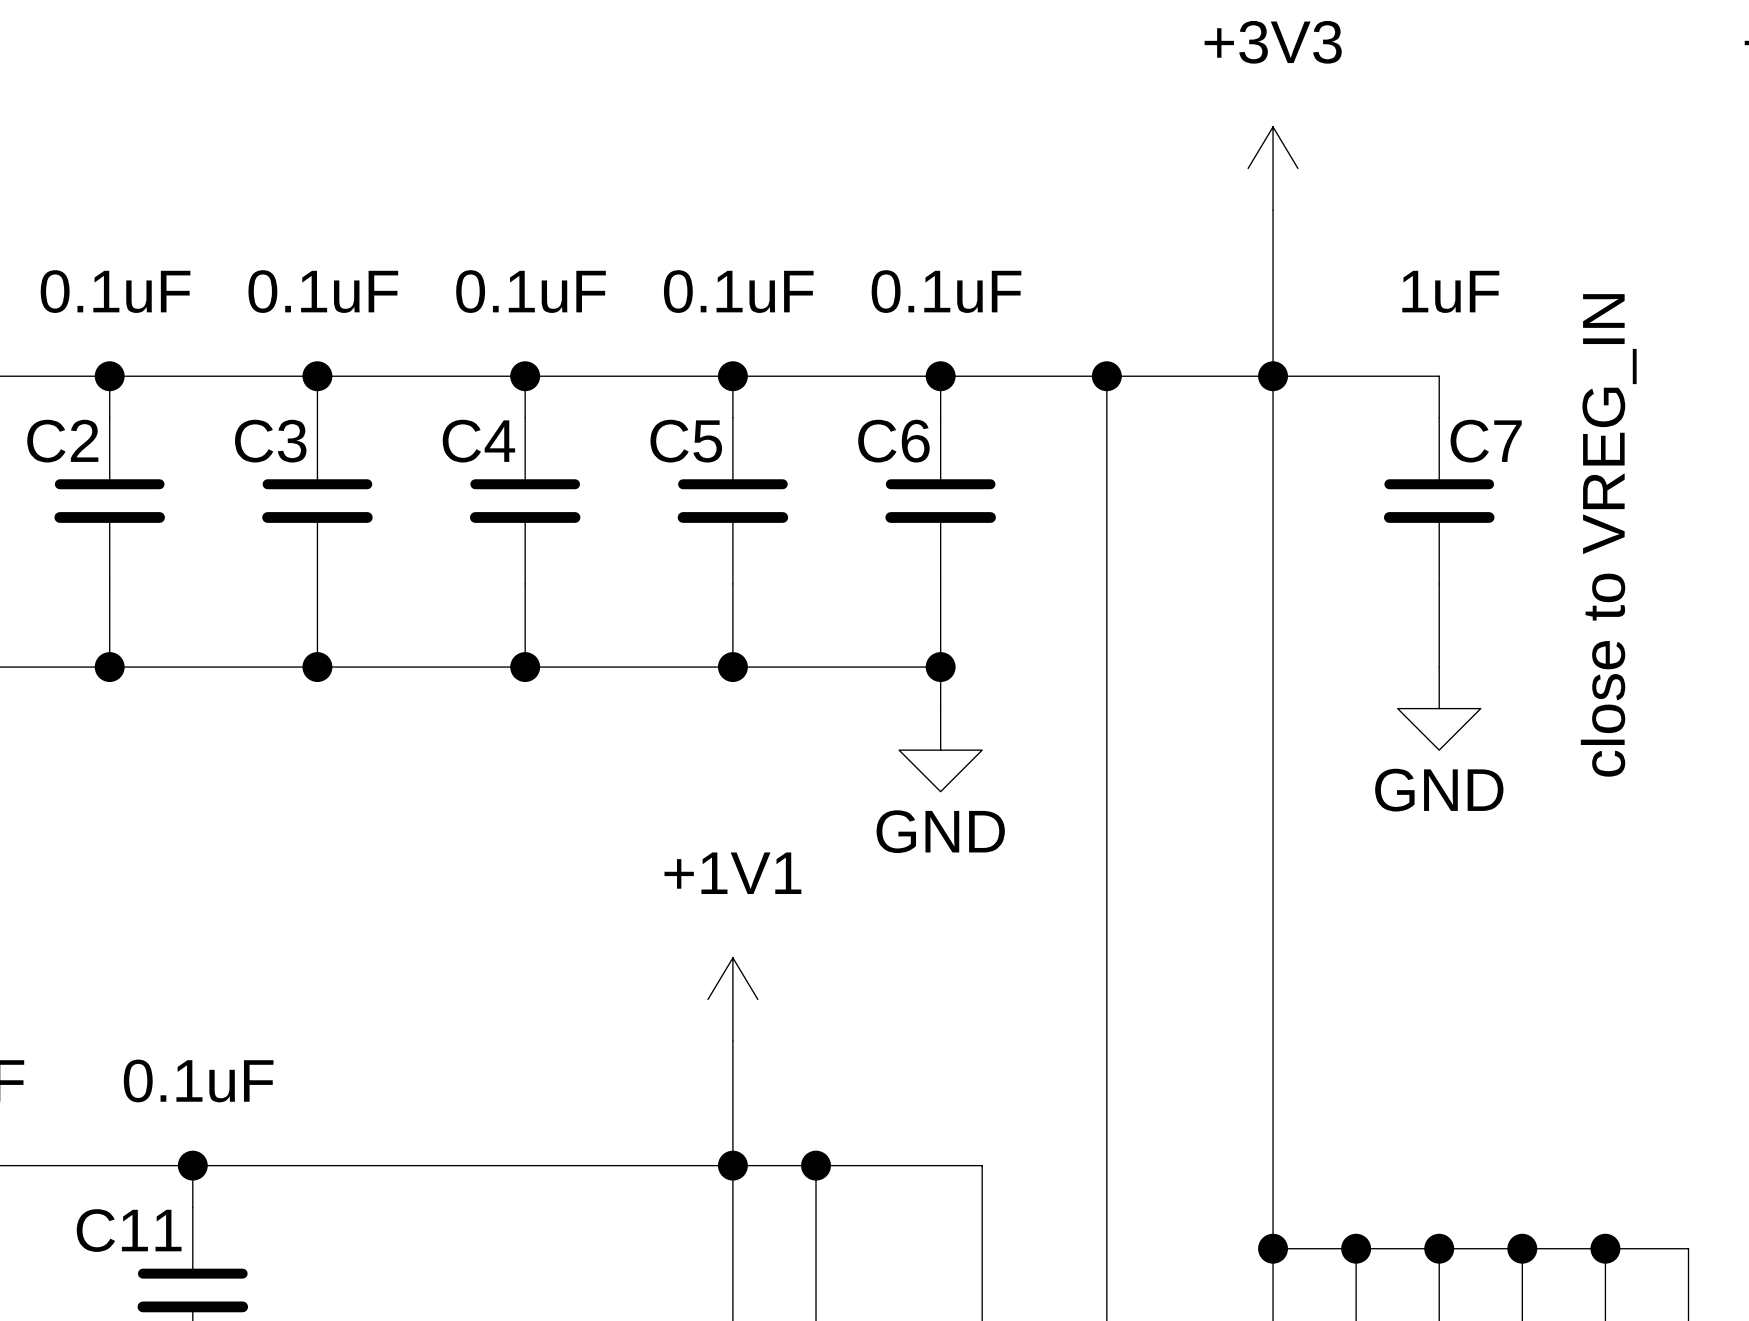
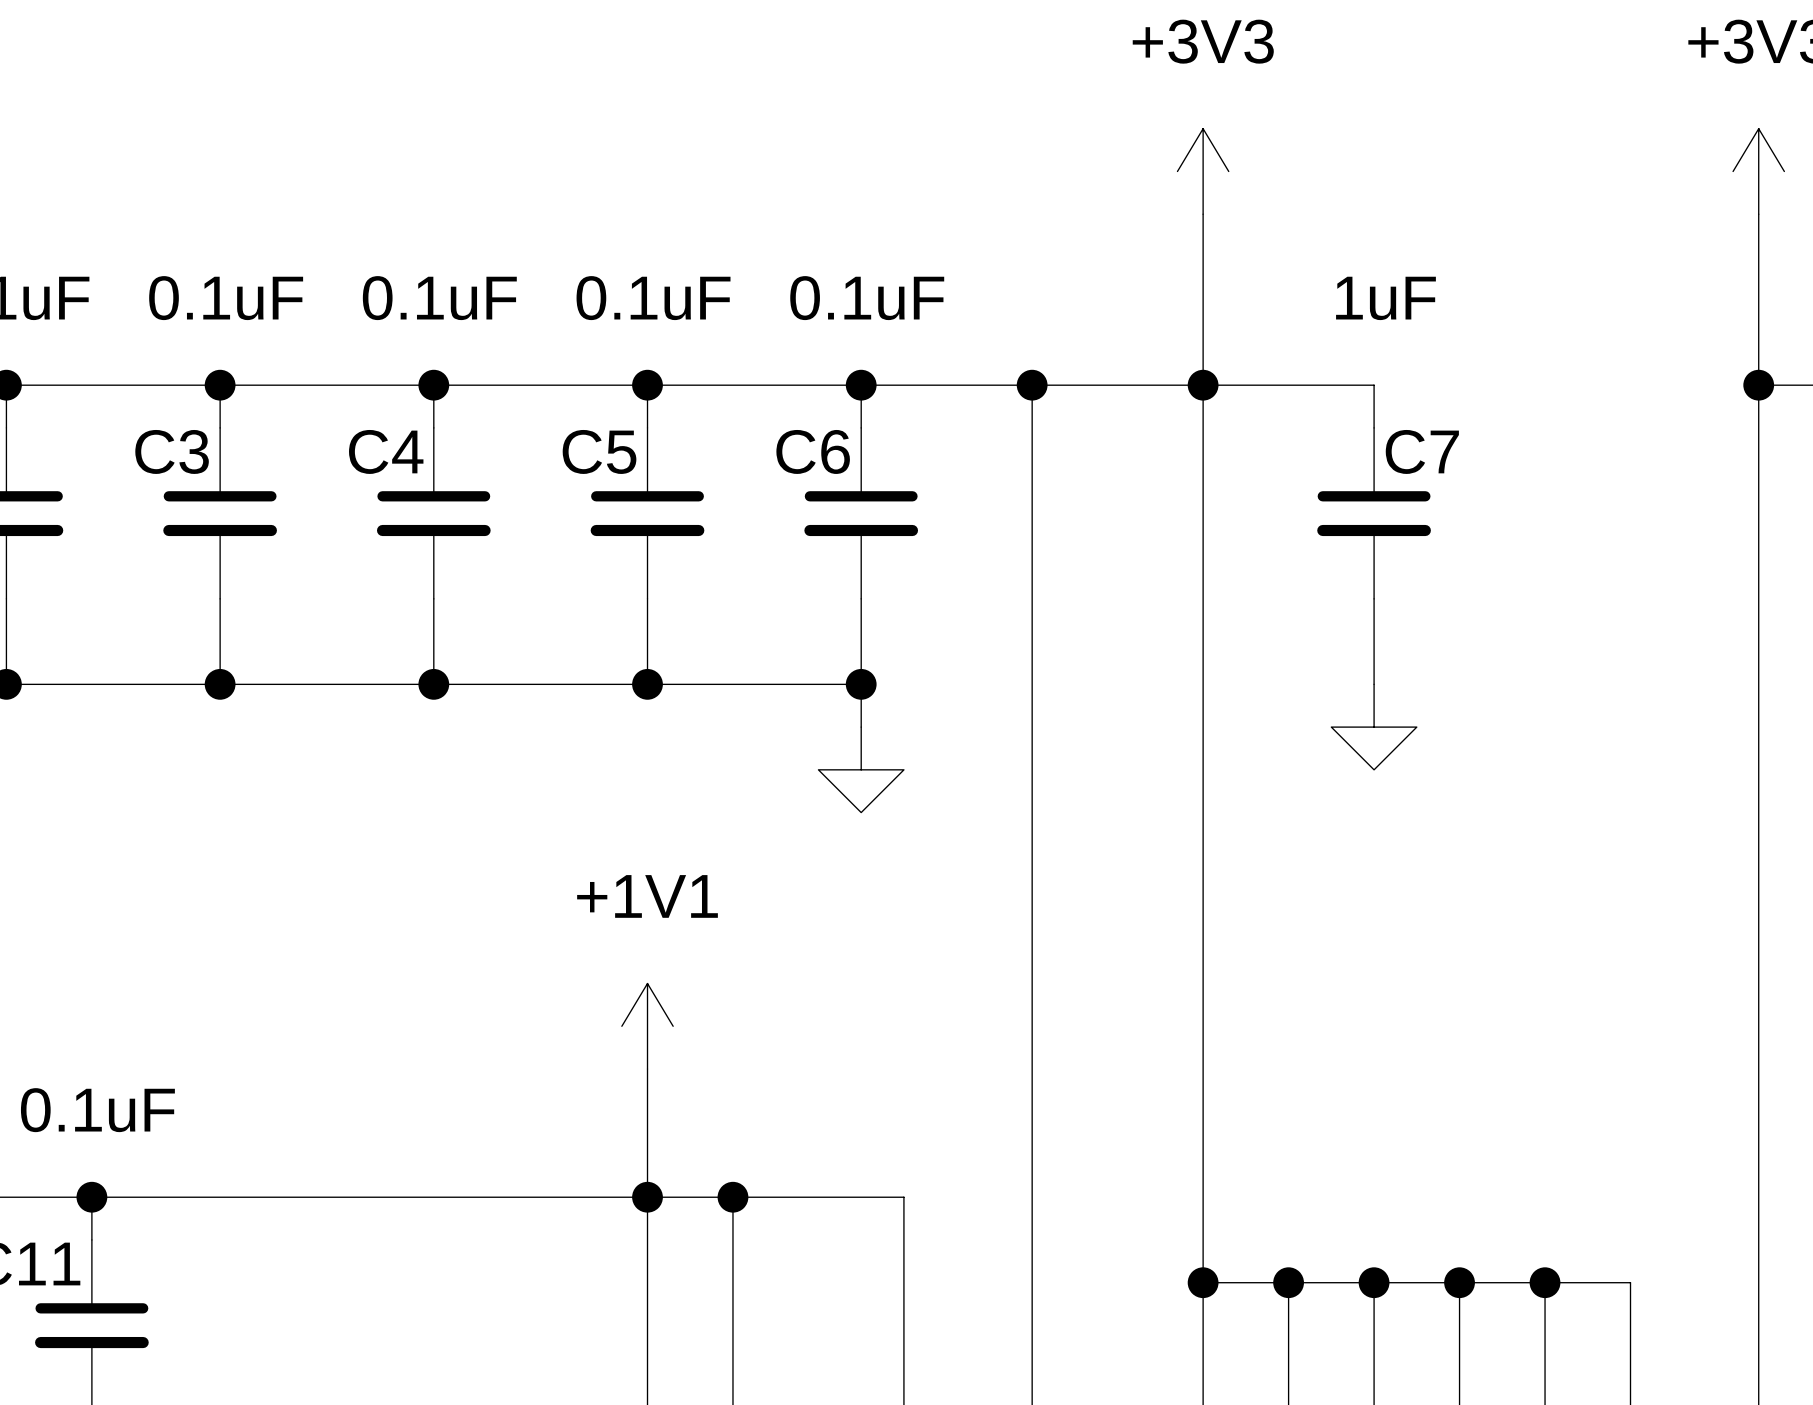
text: close to VREG_IN (1608, 535) -> none
power symbol text: GND (1439, 790) -> none
power symbol text: GND (940, 831) -> none

